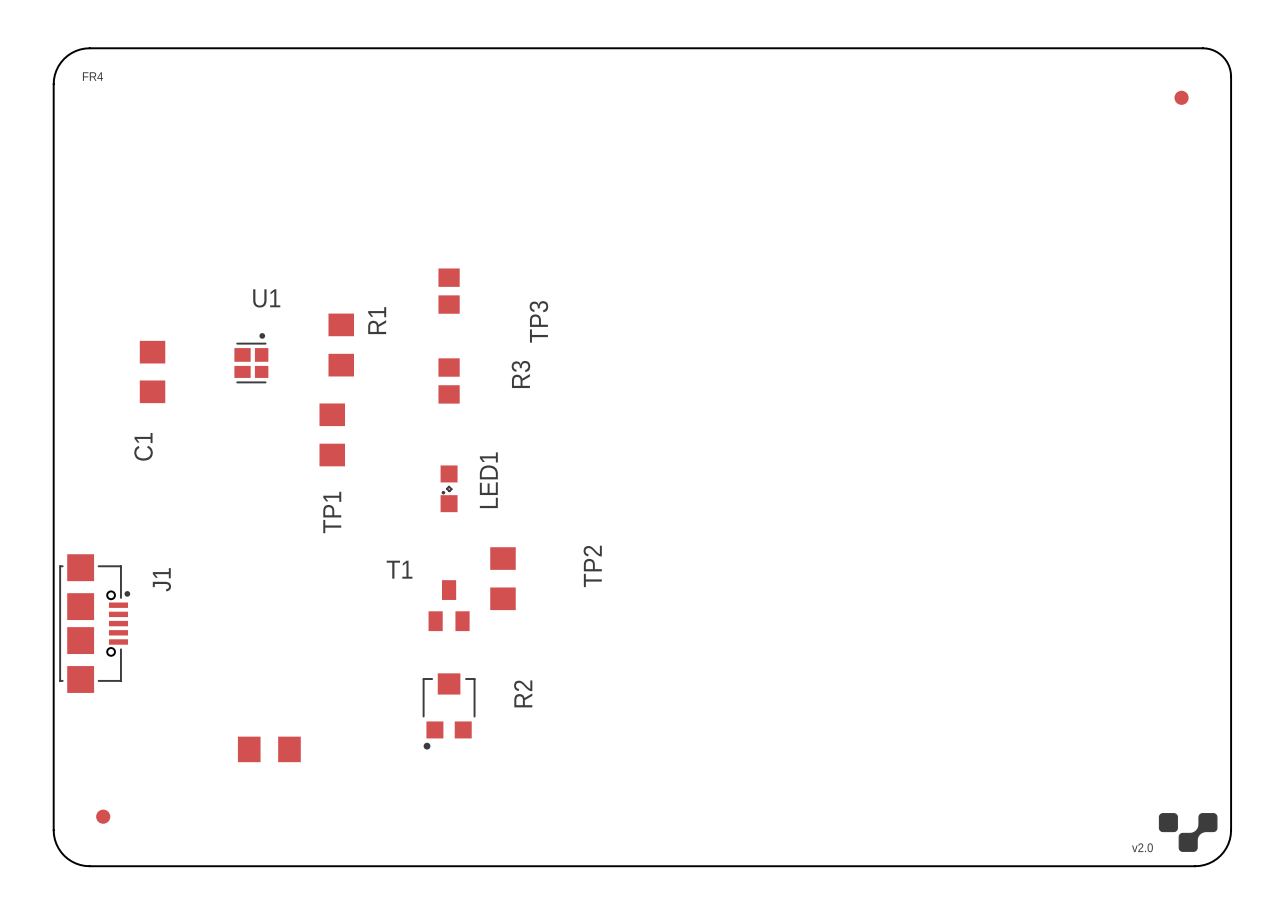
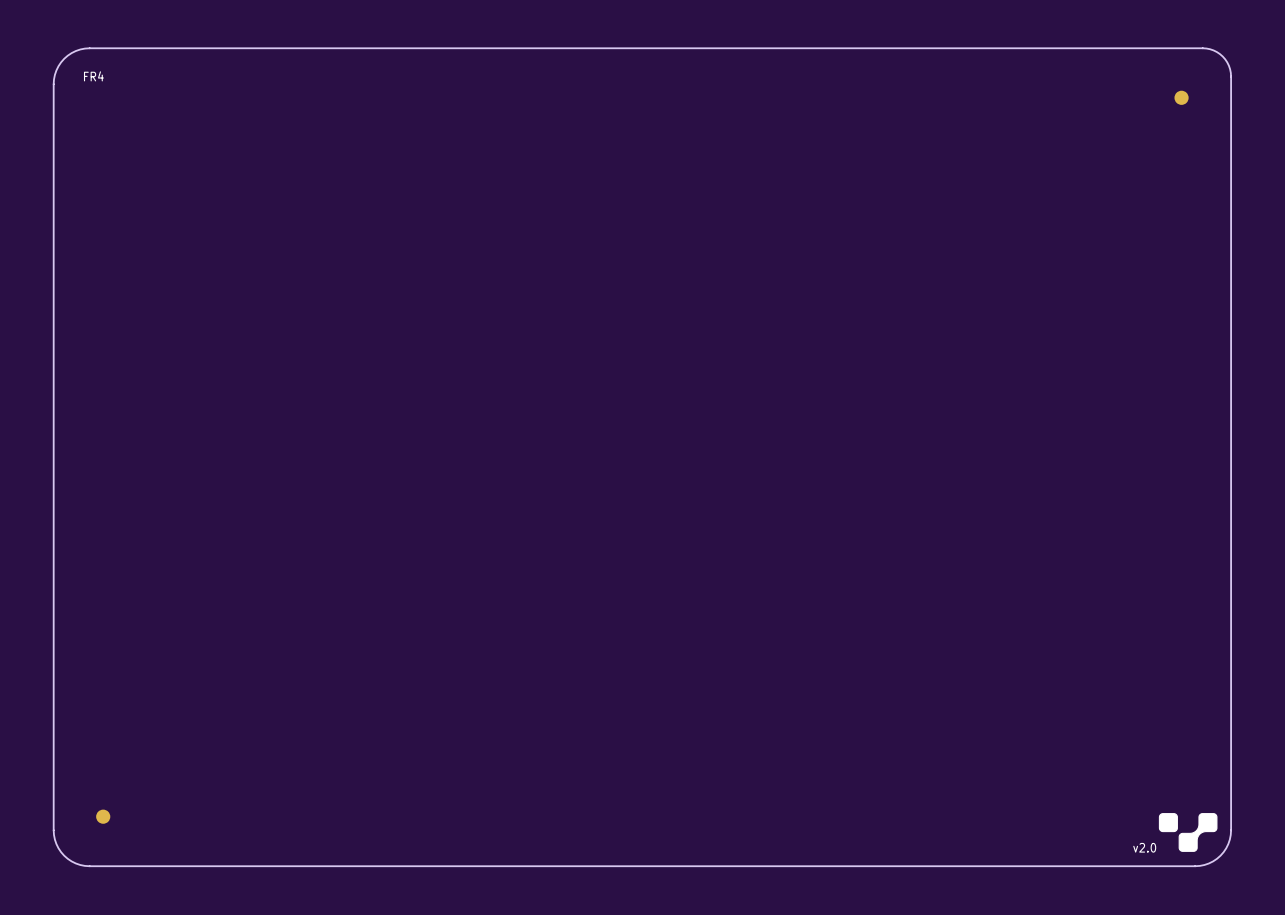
TP3: (449, 291) -> none
R1: (341, 345) -> none
U1: (251, 358) -> none
C1: (152, 371) -> none
R3: (449, 380) -> none
TP1: (332, 434) -> none
LED1: (449, 488) -> none
TP2: (502, 578) -> none
T1: (449, 605) -> none
J1: (94, 623) -> none
R2: (449, 711) -> none
part: (269, 749) -> none

